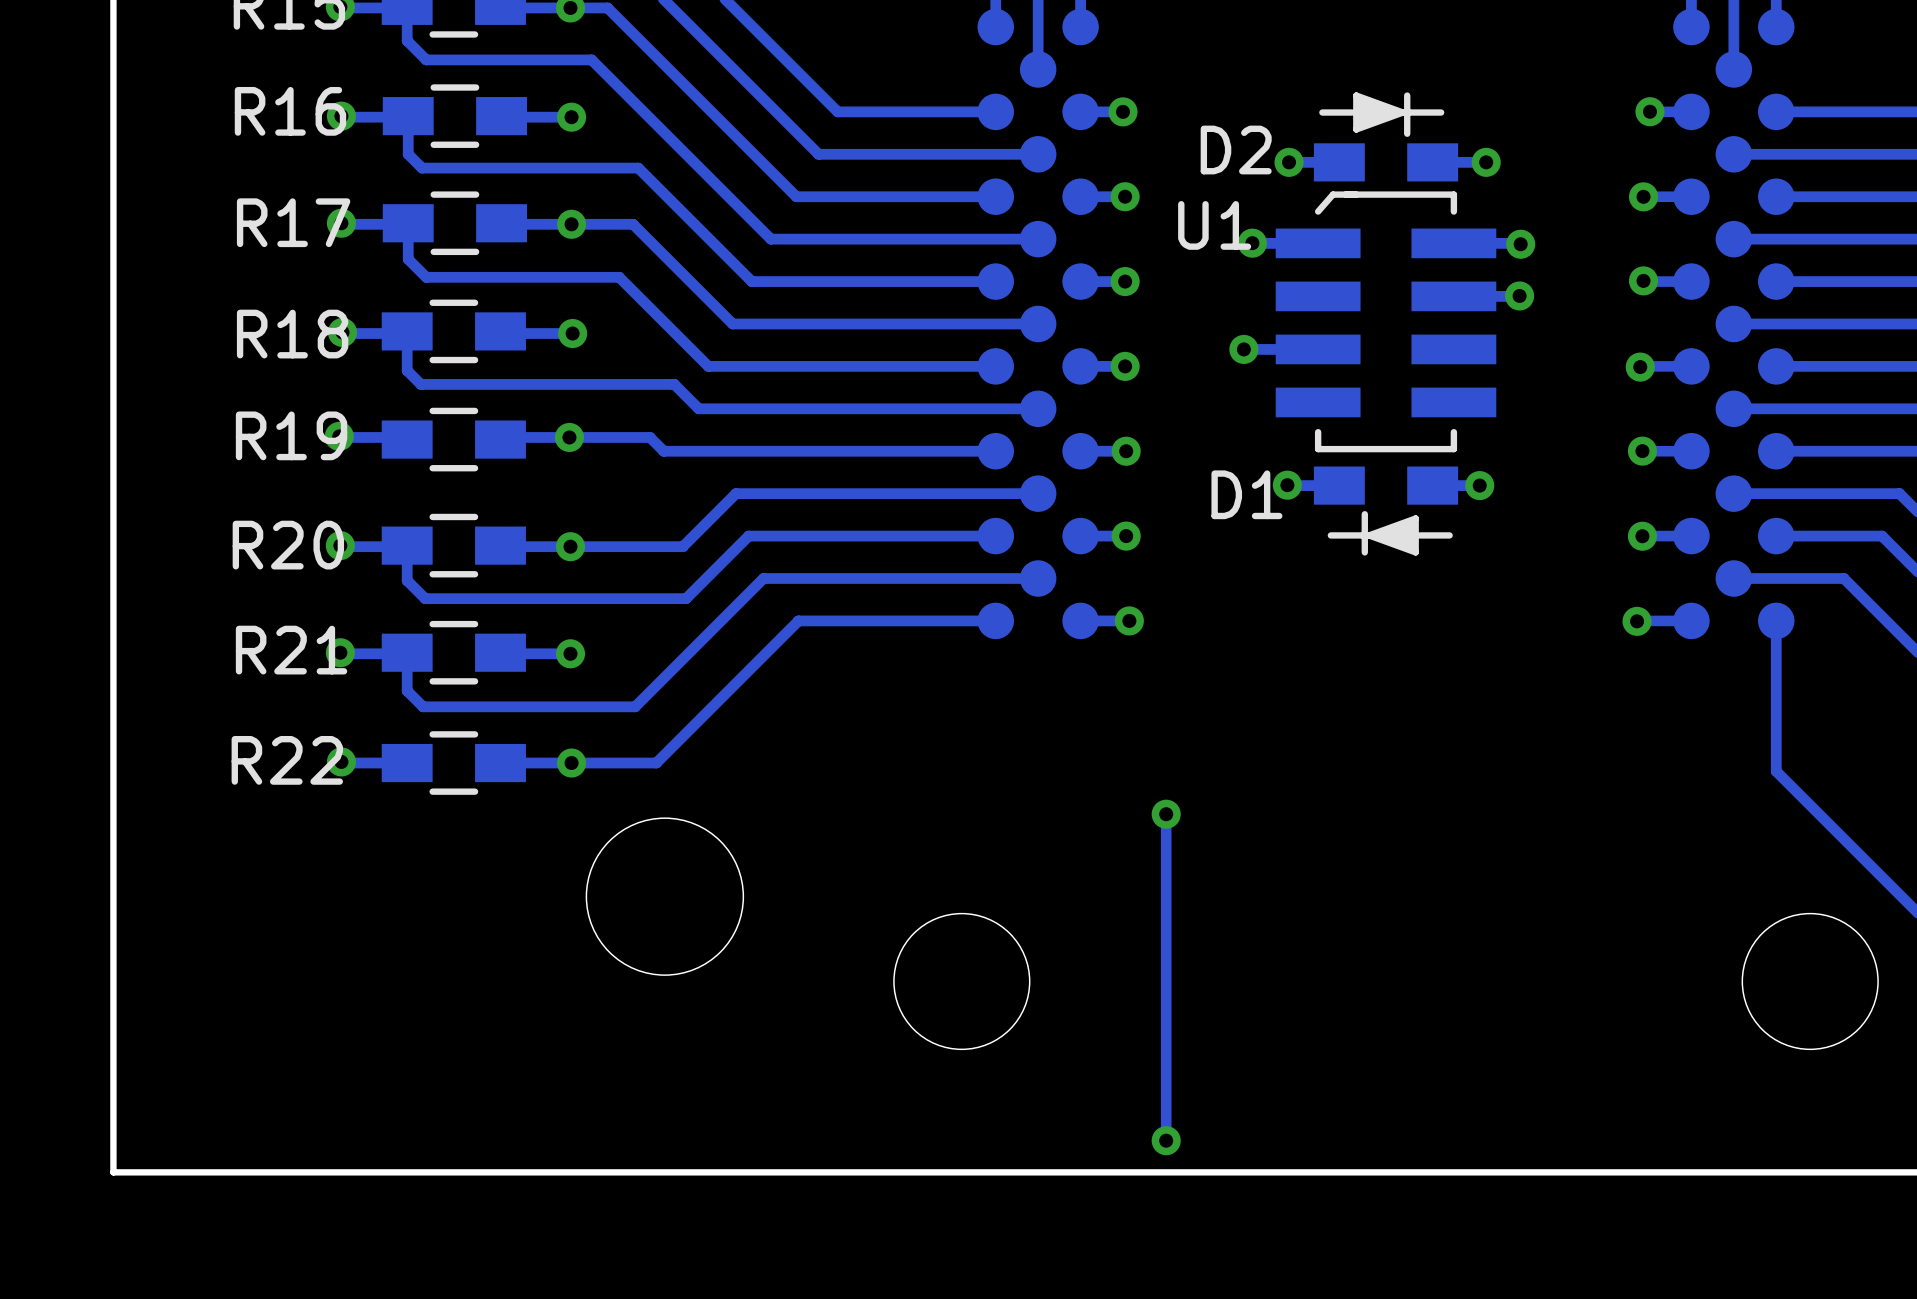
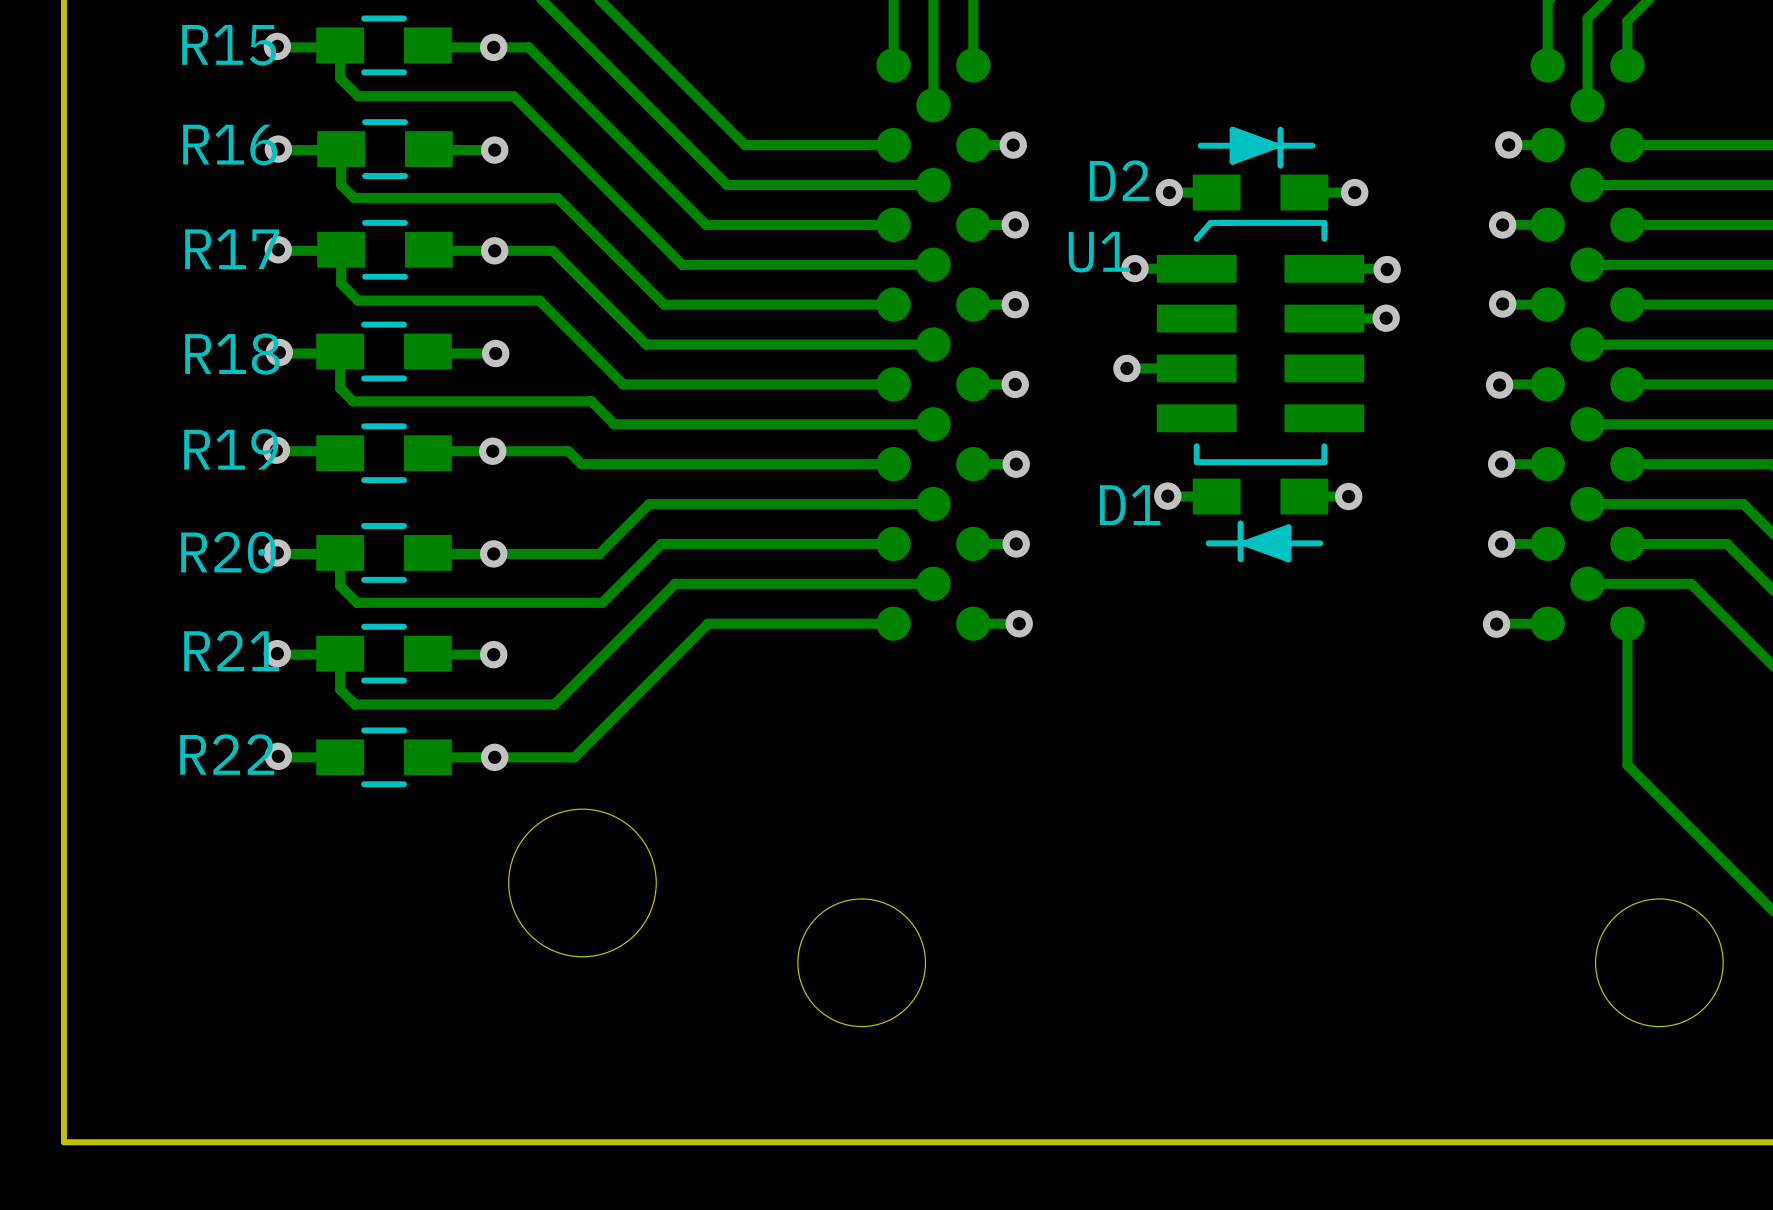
track: (1166, 814) (1166, 1140) -> none
via: (1166, 814) -> none
via: (1166, 1140) -> none

